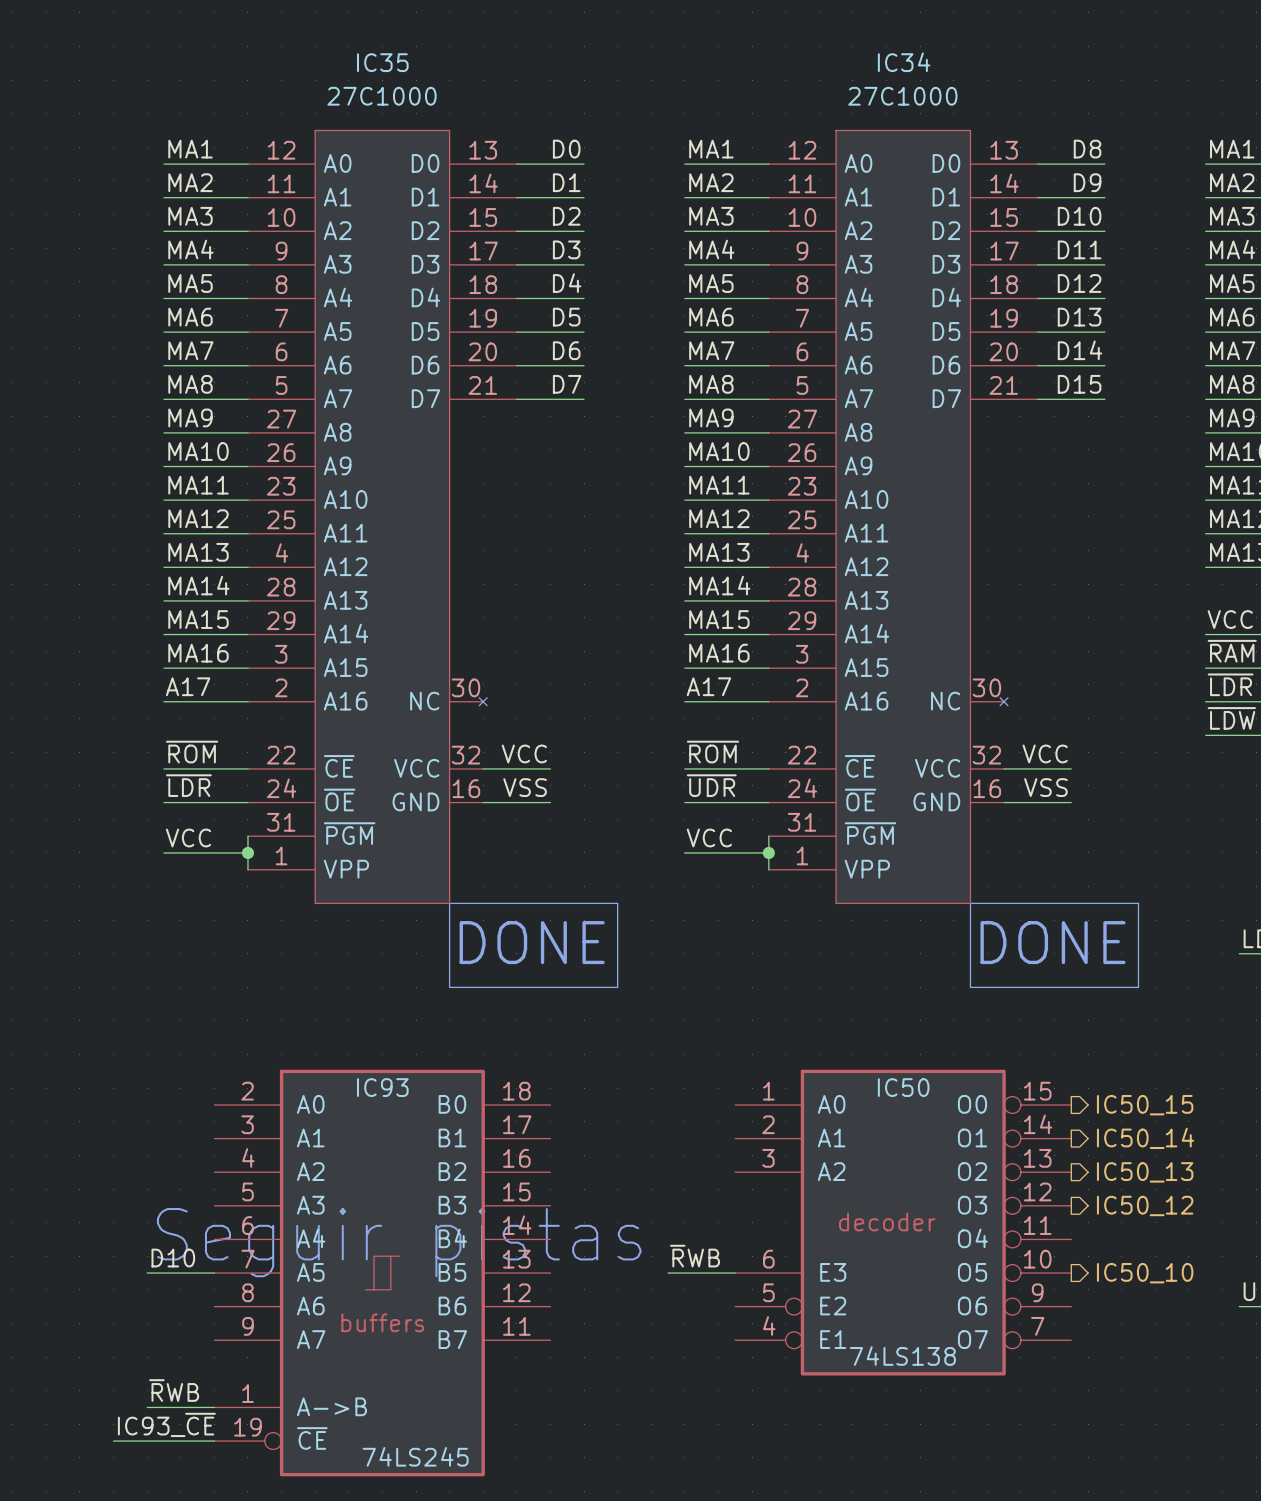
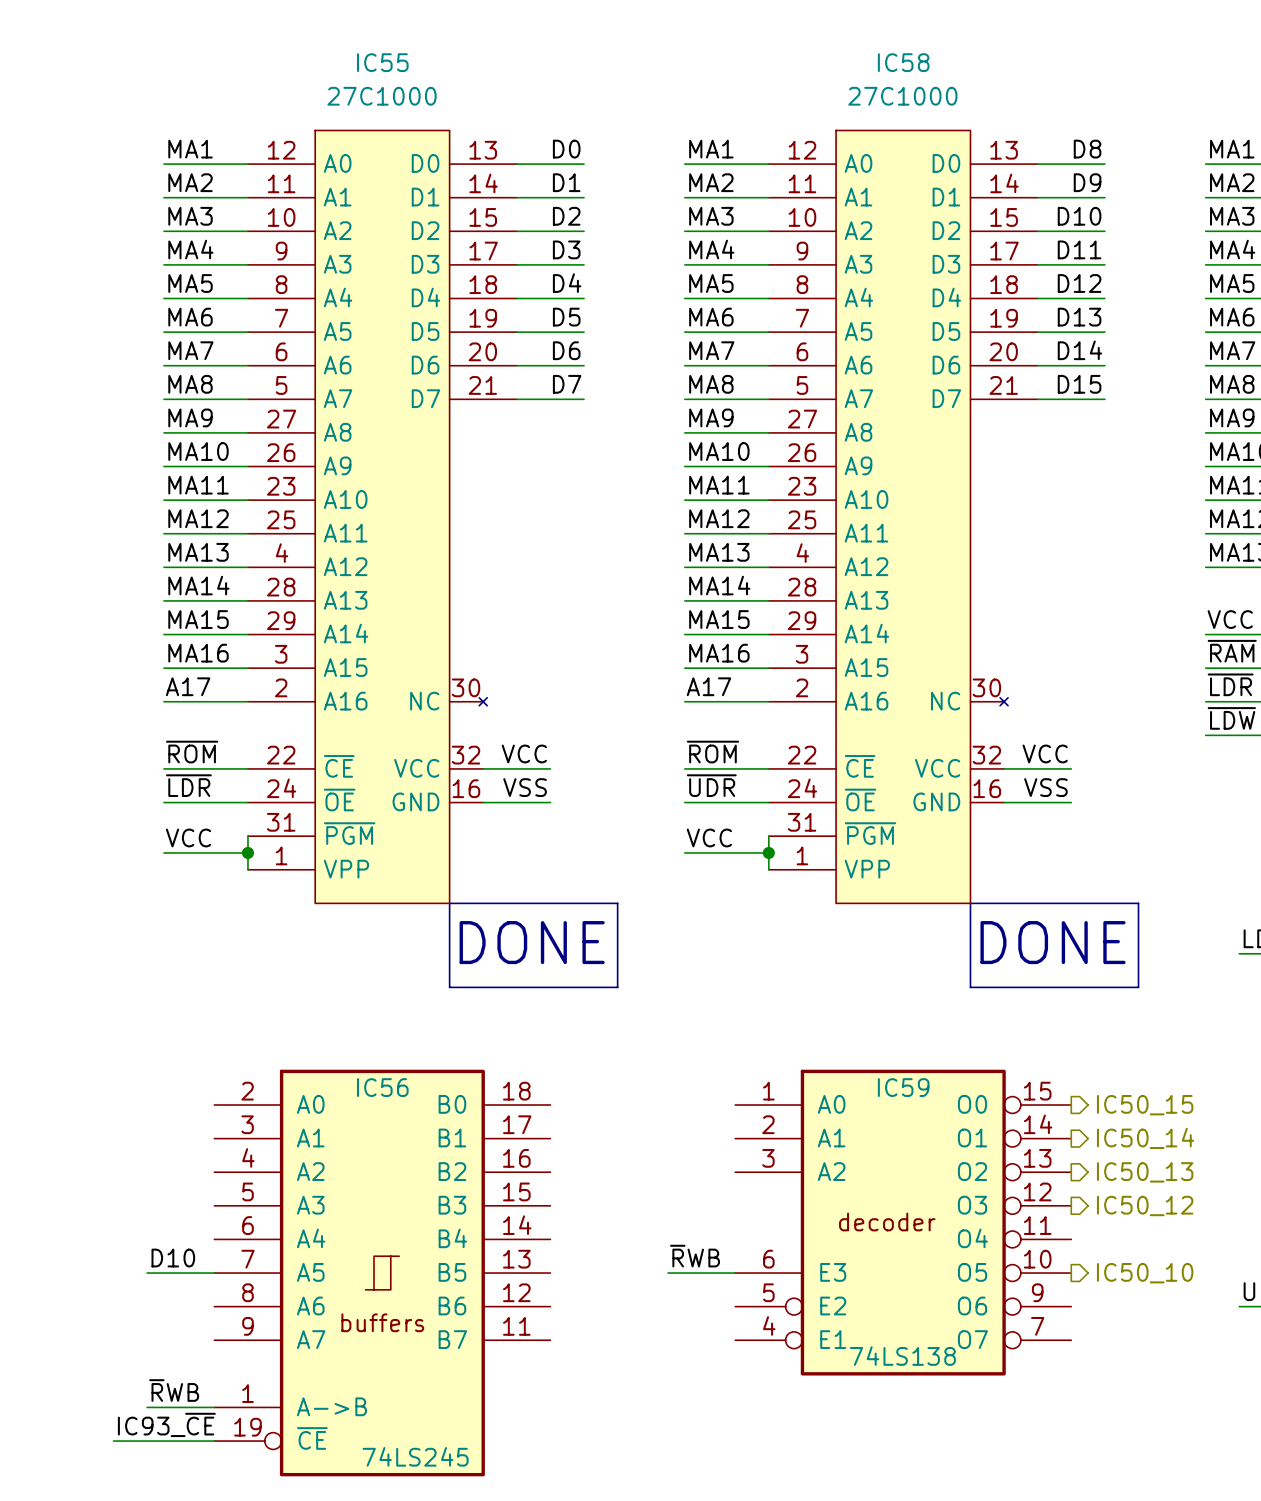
IC35 name: IC35 (382, 62) -> IC55 (382, 62)
IC34 name: IC34 (904, 62) -> IC58 (903, 62)
IC93 name: IC93 (382, 1087) -> IC56 (382, 1087)
IC50 name: IC50 (903, 1087) -> IC59 (903, 1087)
text: Seguir pistas (399, 1242) -> none

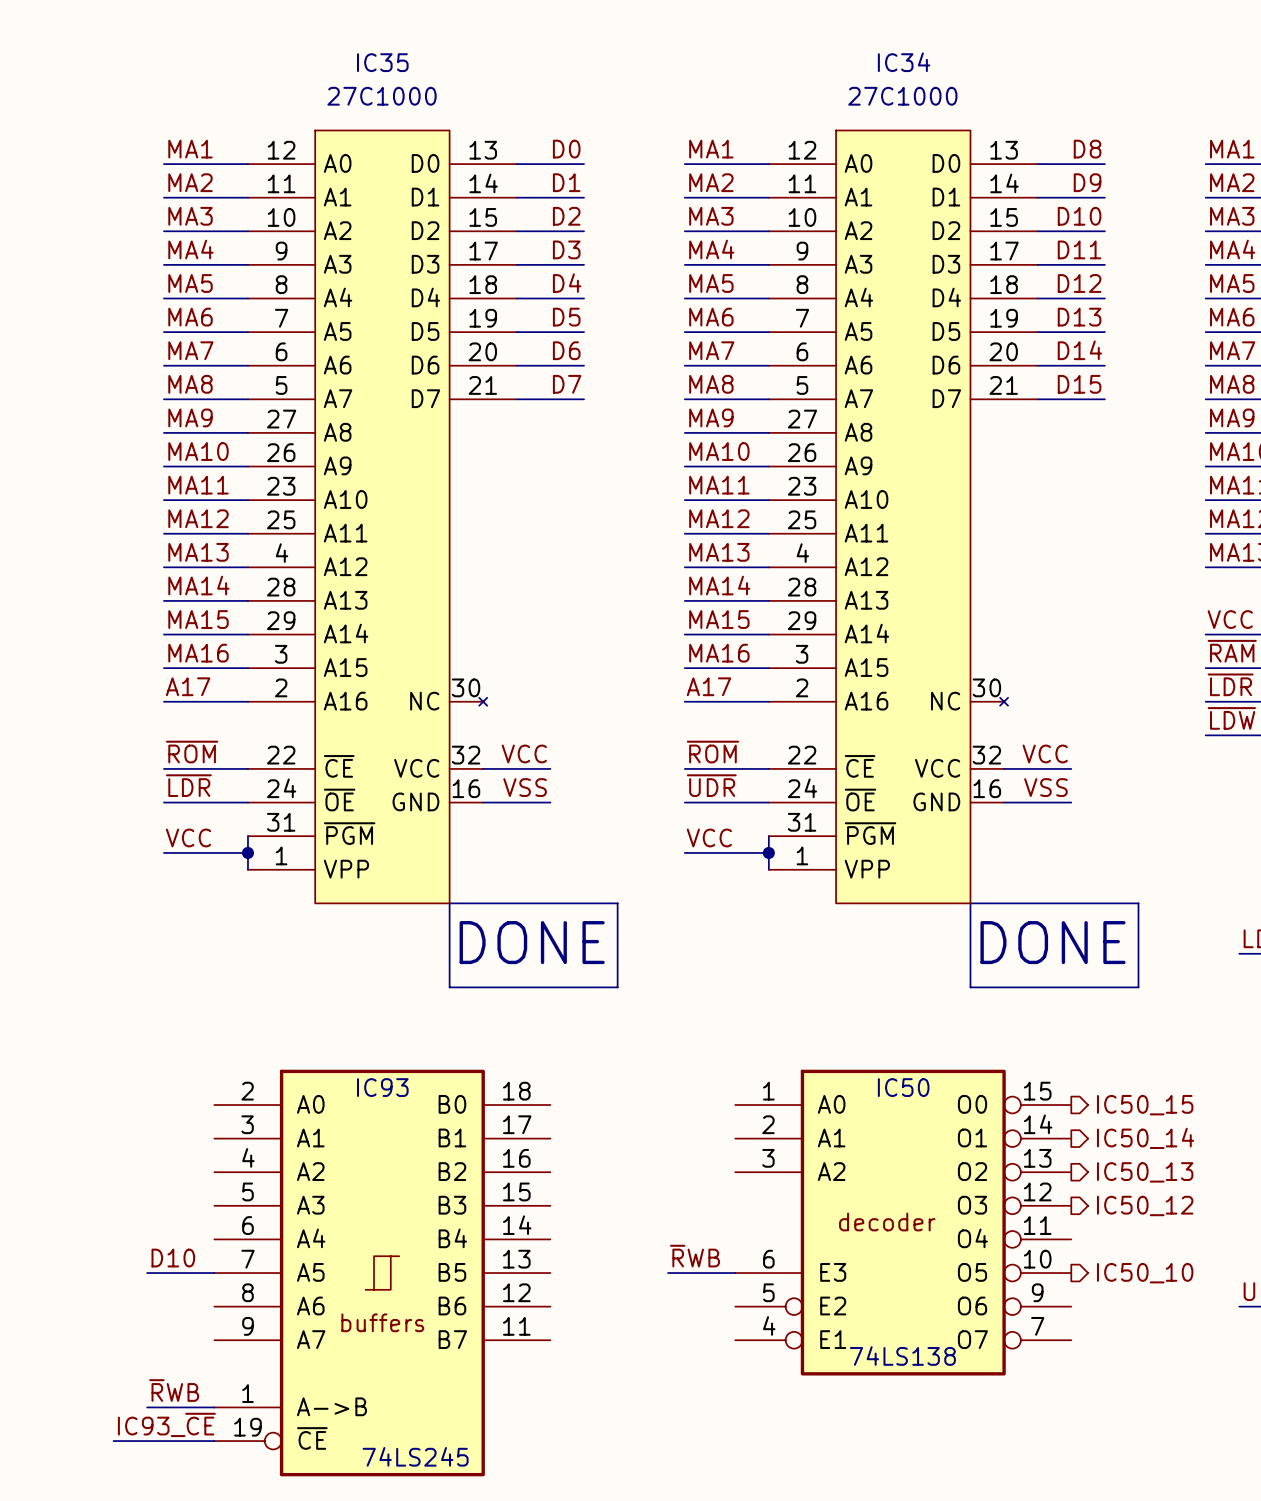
IC55 name: IC55 (382, 62) -> IC35 (382, 62)
IC58 name: IC58 (903, 62) -> IC34 (904, 62)
IC56 name: IC56 (382, 1087) -> IC93 (382, 1087)
IC59 name: IC59 (903, 1087) -> IC50 (903, 1087)

